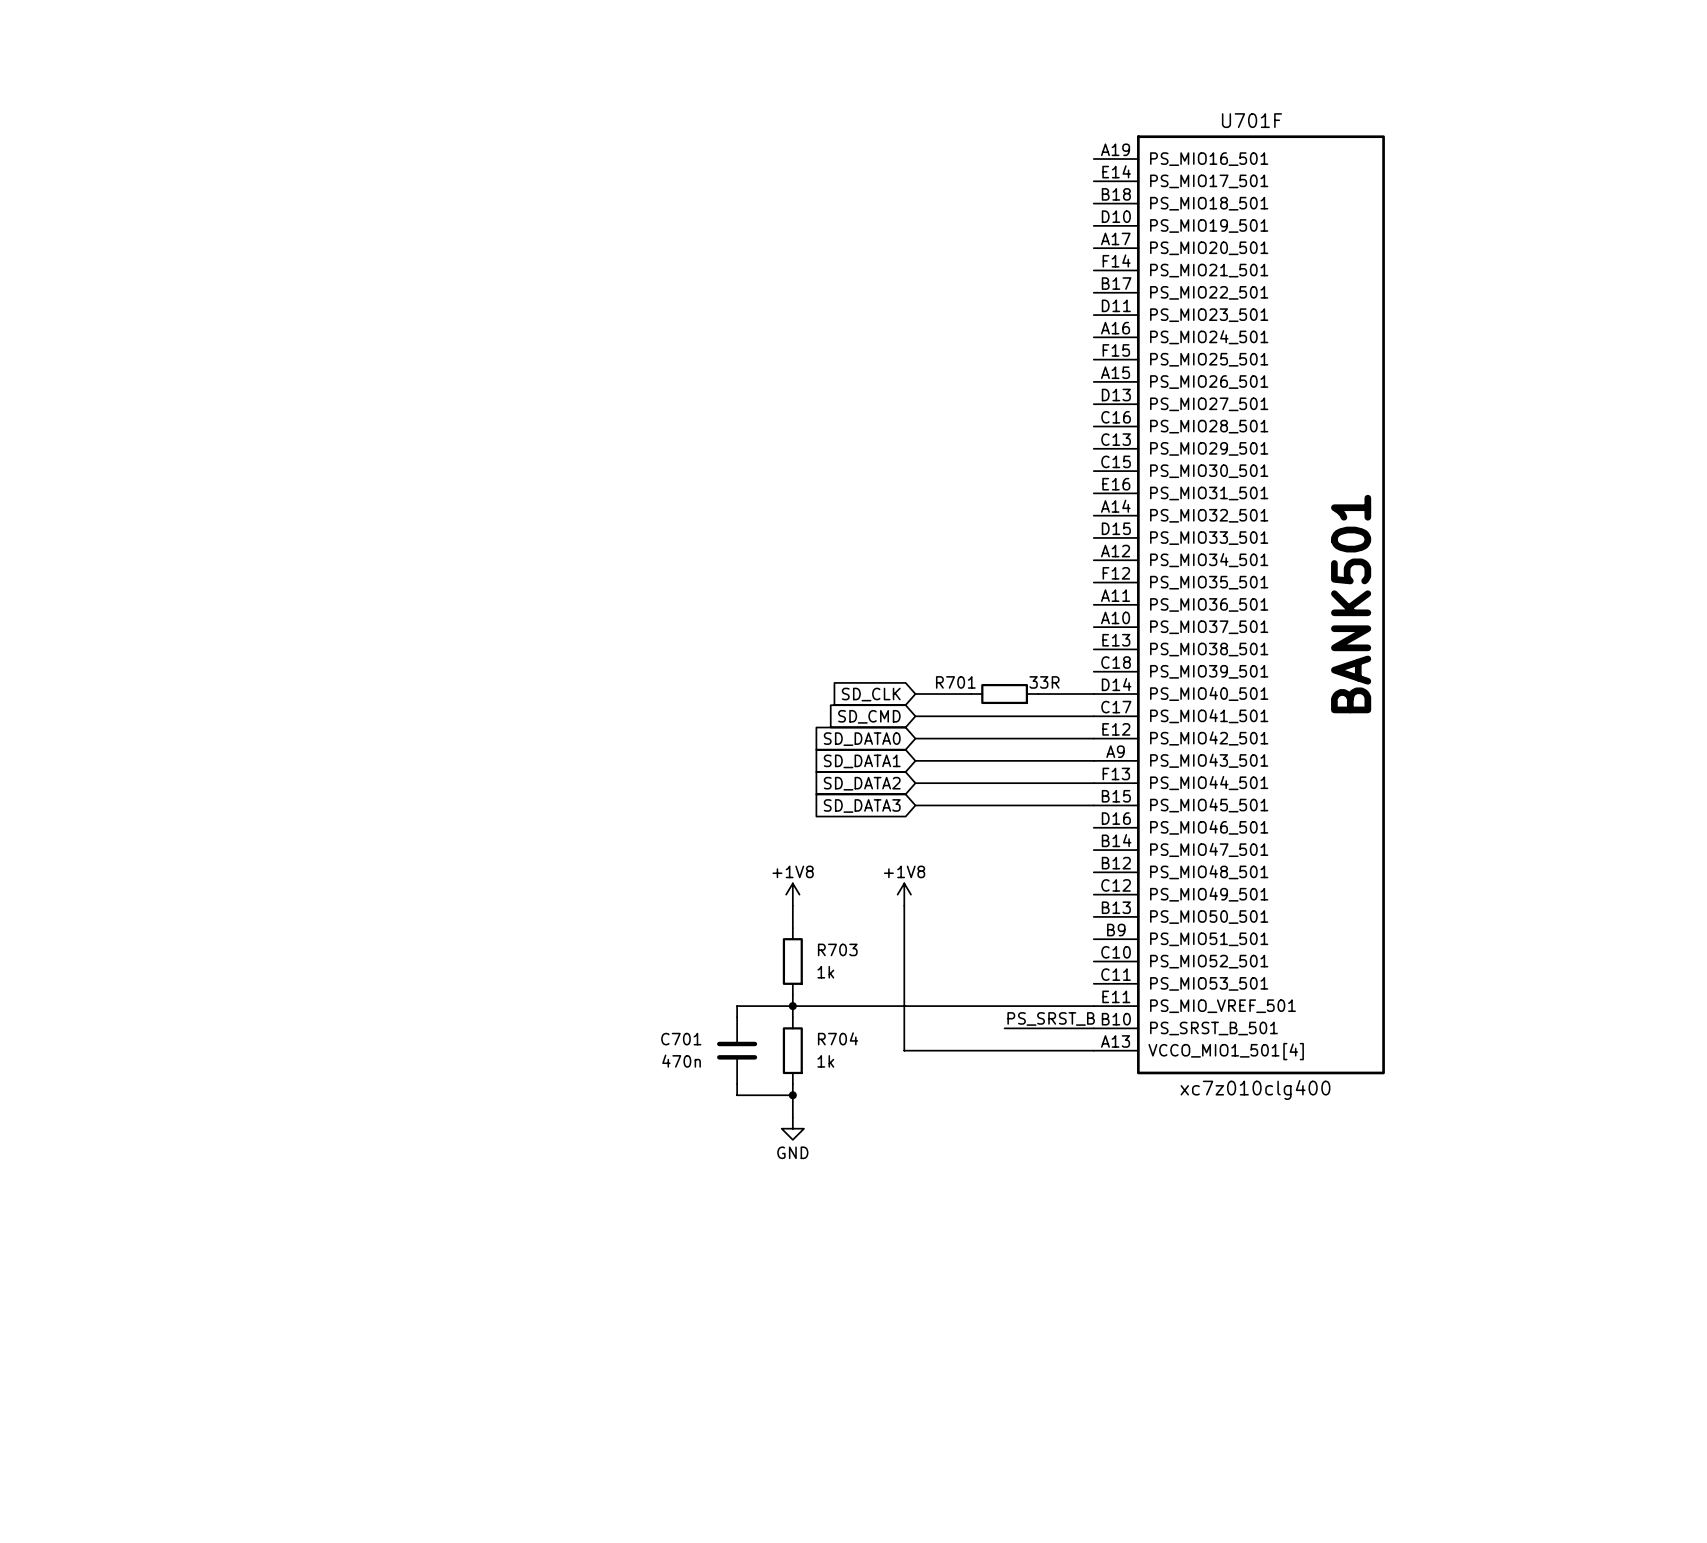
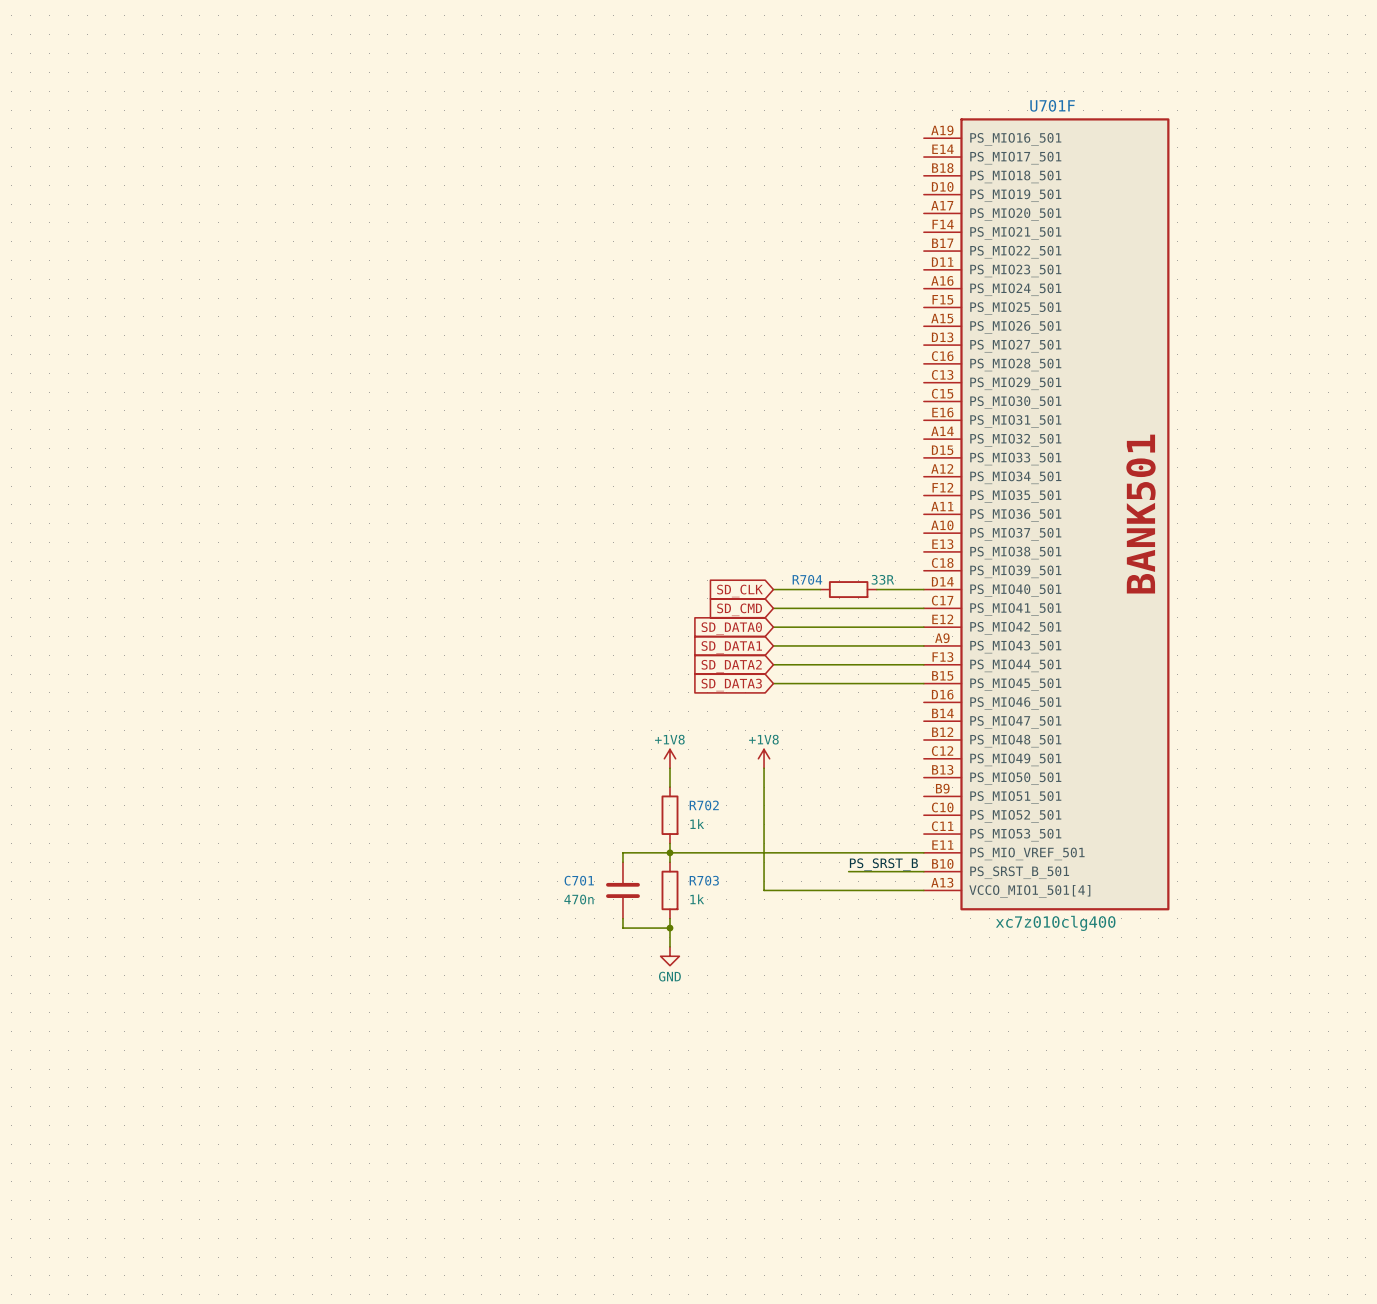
R701 name: R701 (955, 682) -> R704 (807, 579)
R703 name: R703 (837, 949) -> R702 (704, 805)
R704 name: R704 (838, 1038) -> R703 (704, 880)

